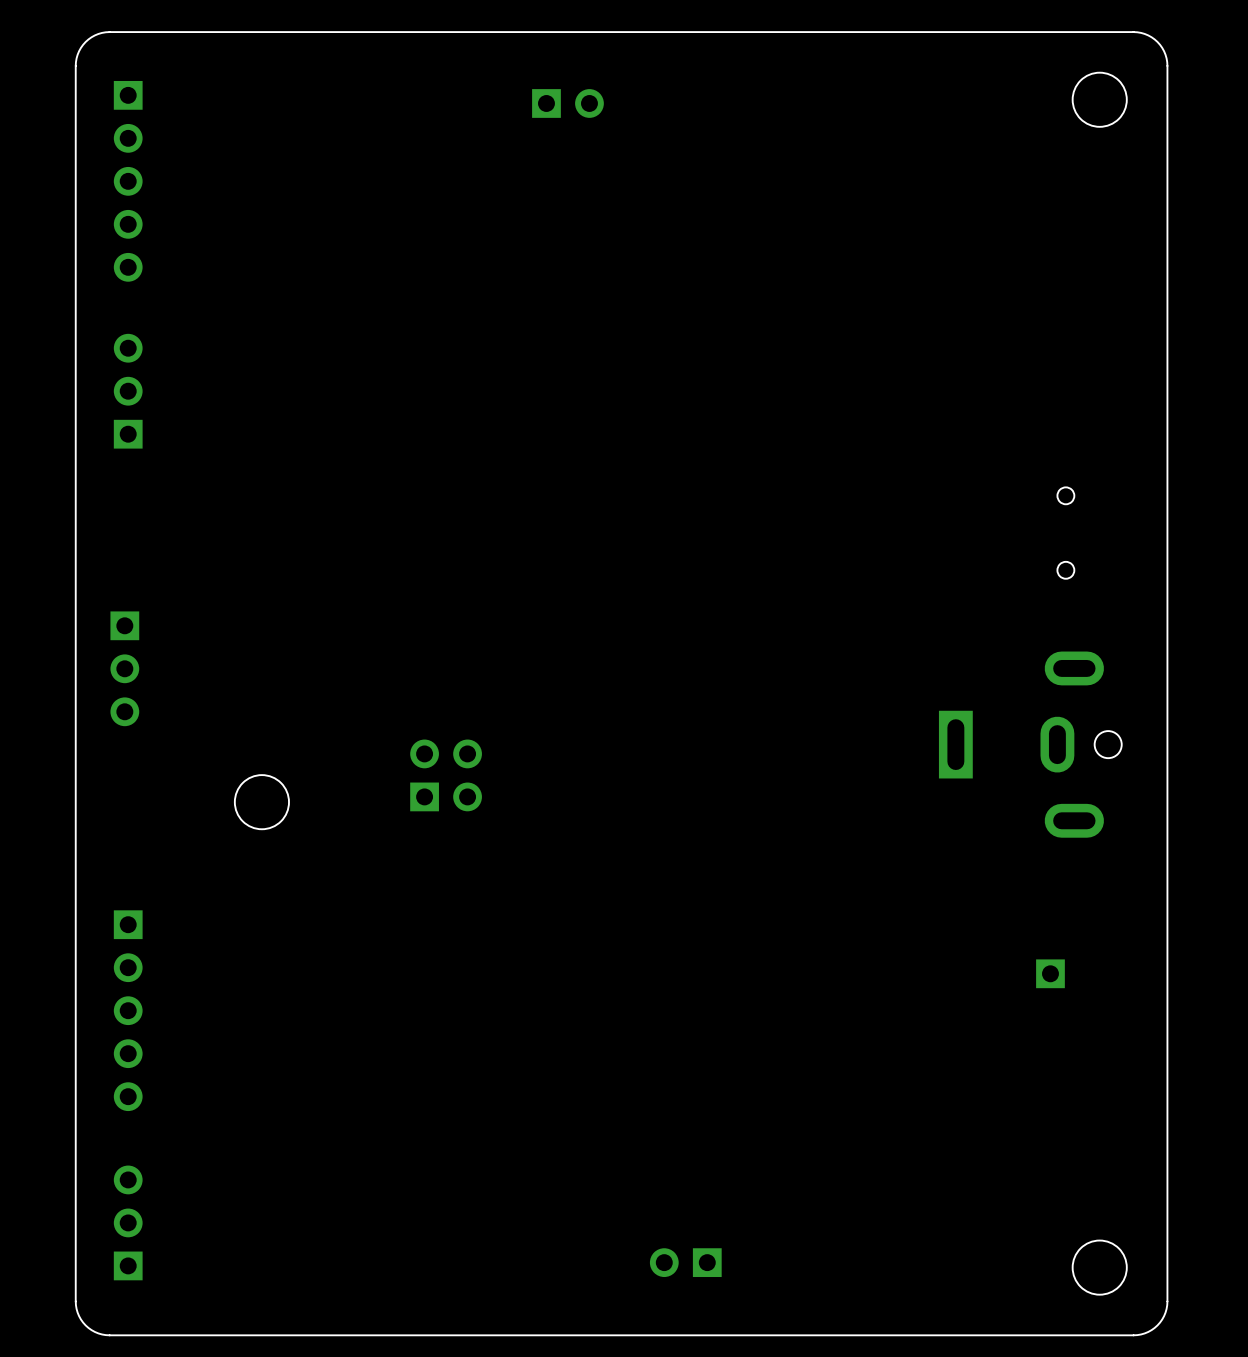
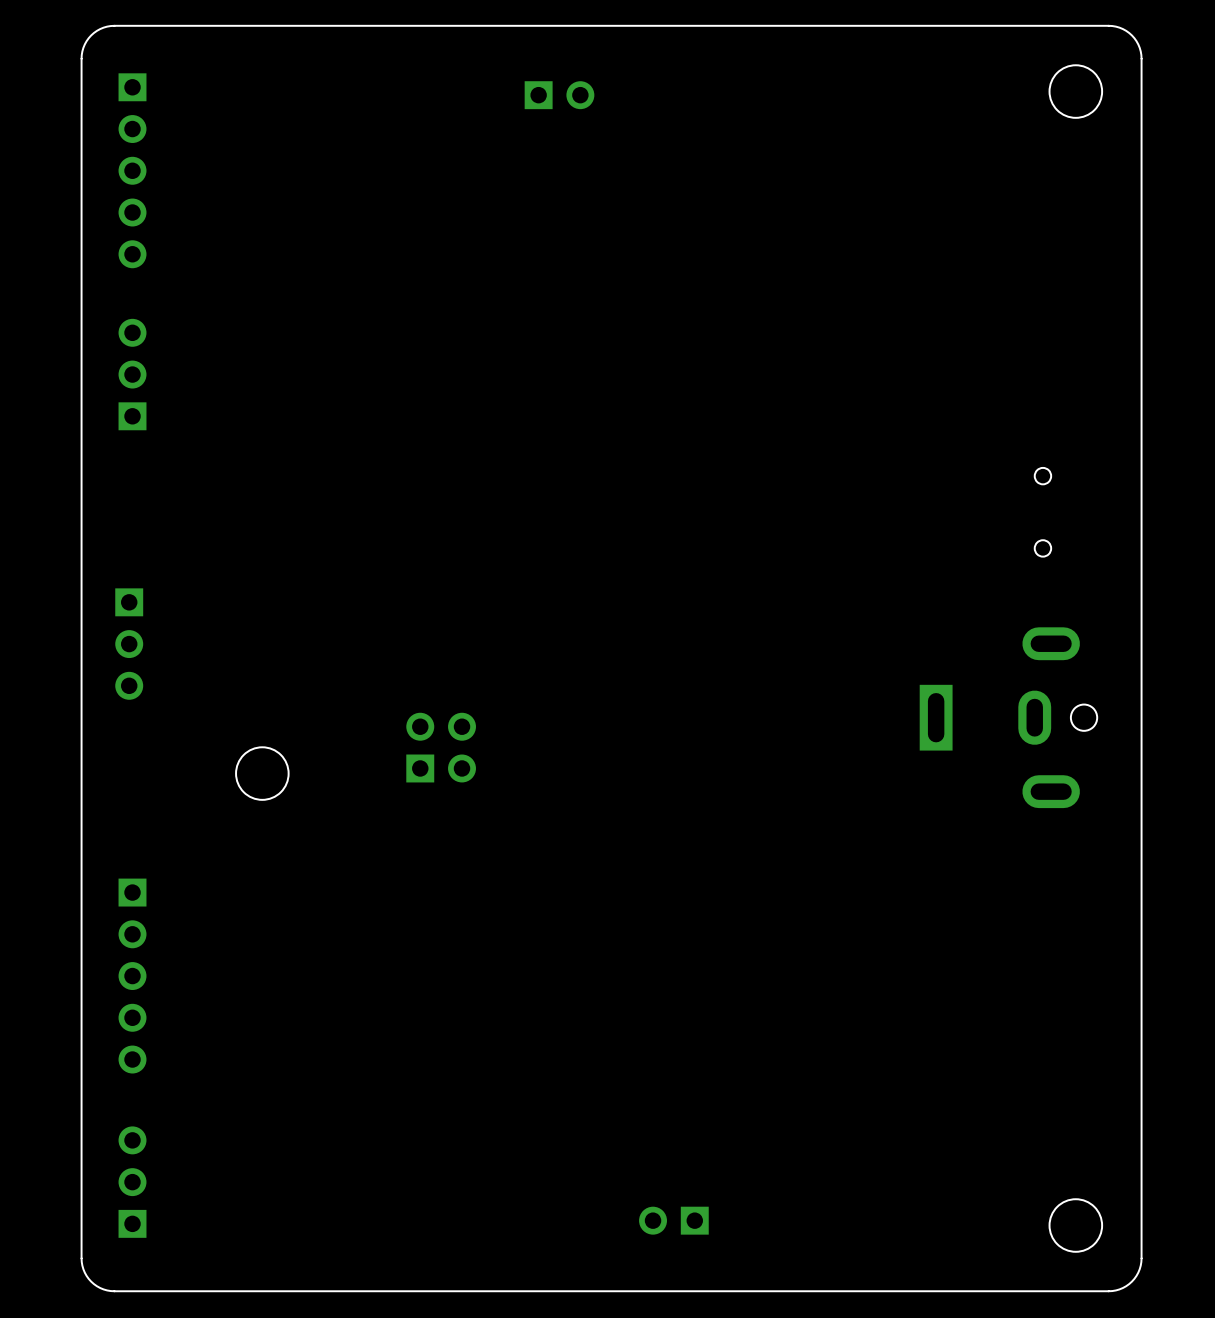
part: (1050, 973) -> none

